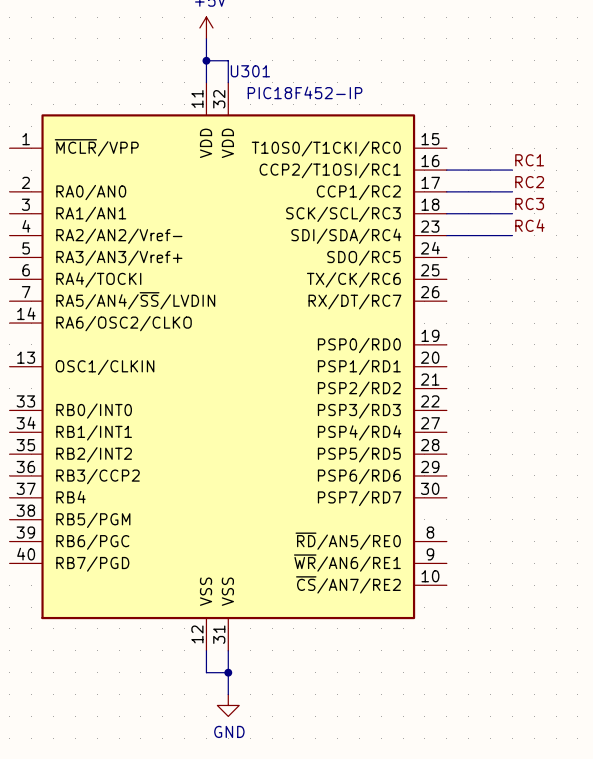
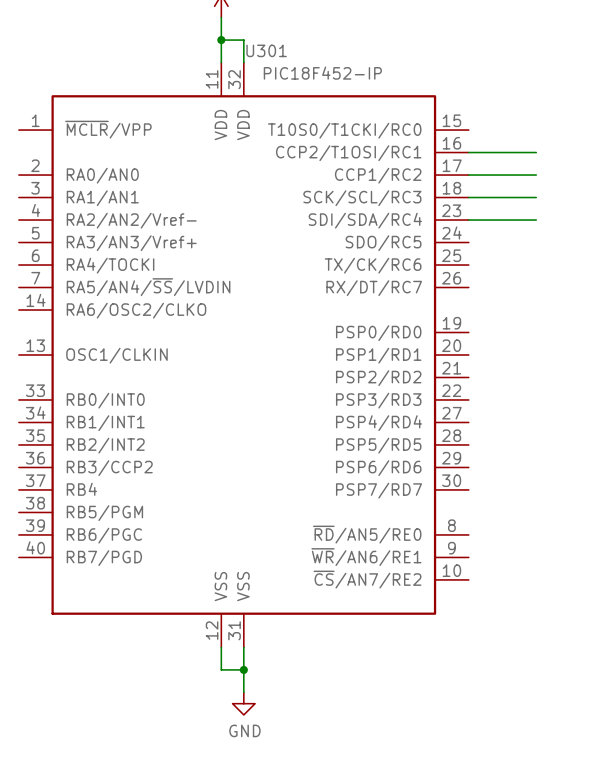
label: RC1 (529, 160) -> none
label: RC2 (529, 182) -> none
label: RC3 (529, 203) -> none
label: RC4 (529, 225) -> none

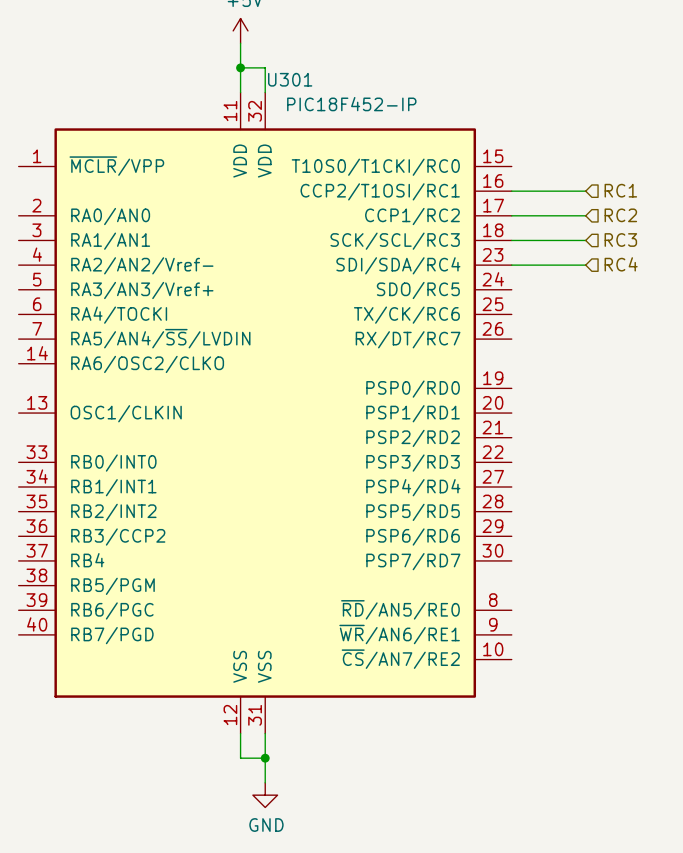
hierarchical label: none -> RC1 (620, 190)
hierarchical label: none -> RC2 (620, 215)
hierarchical label: none -> RC3 (620, 240)
hierarchical label: none -> RC4 (621, 264)

